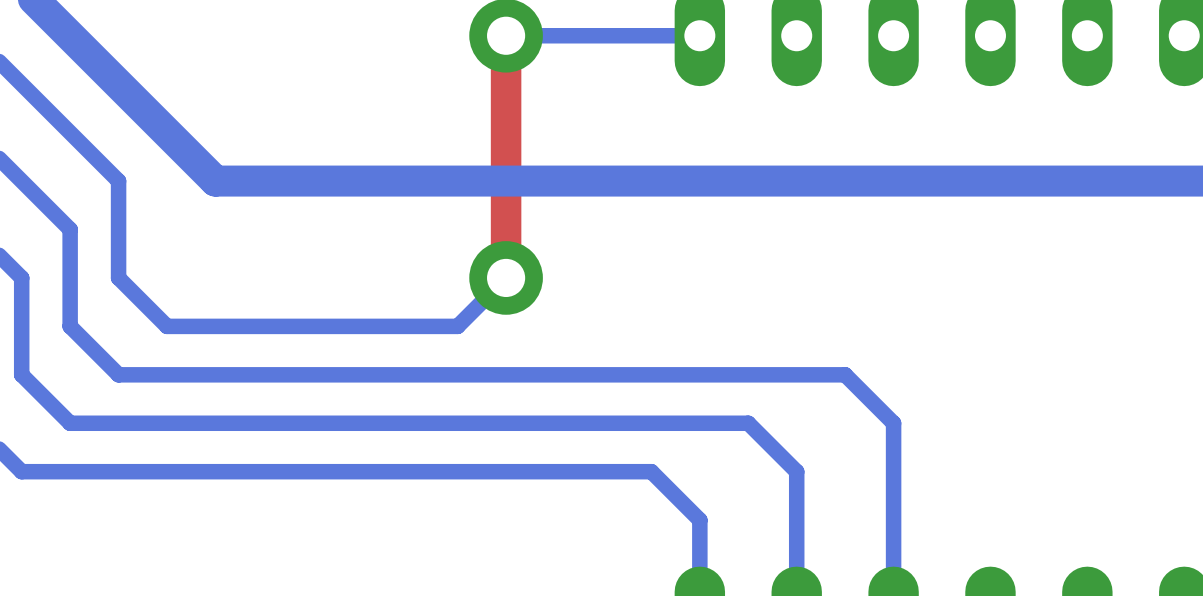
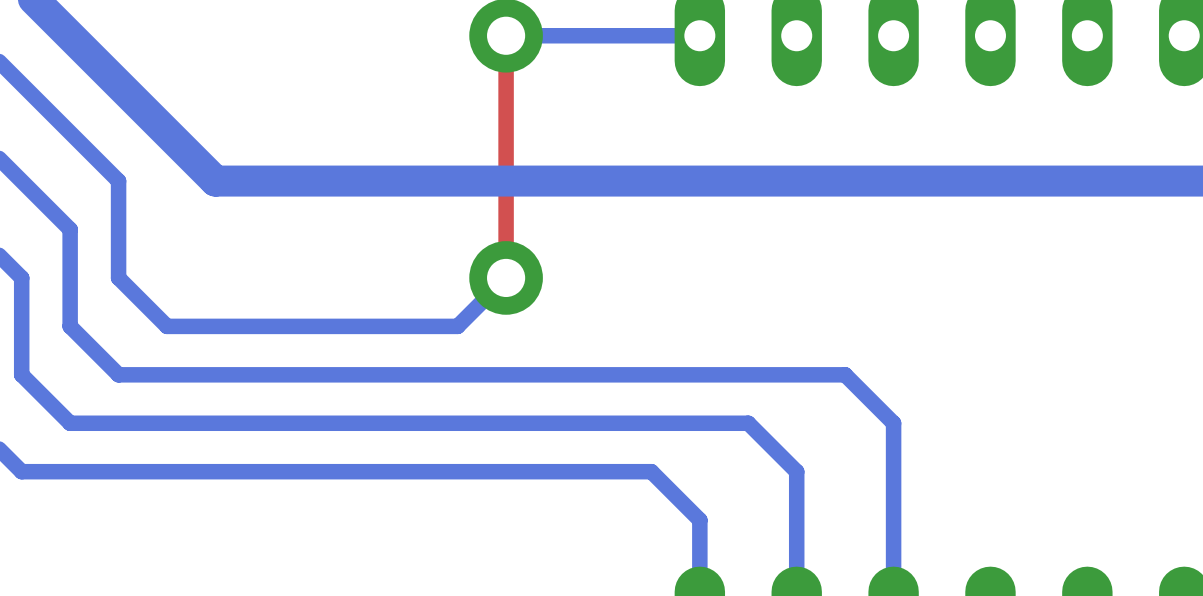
top track width: thick (506, 35) (506, 277) -> thin (506, 35) (506, 277)

